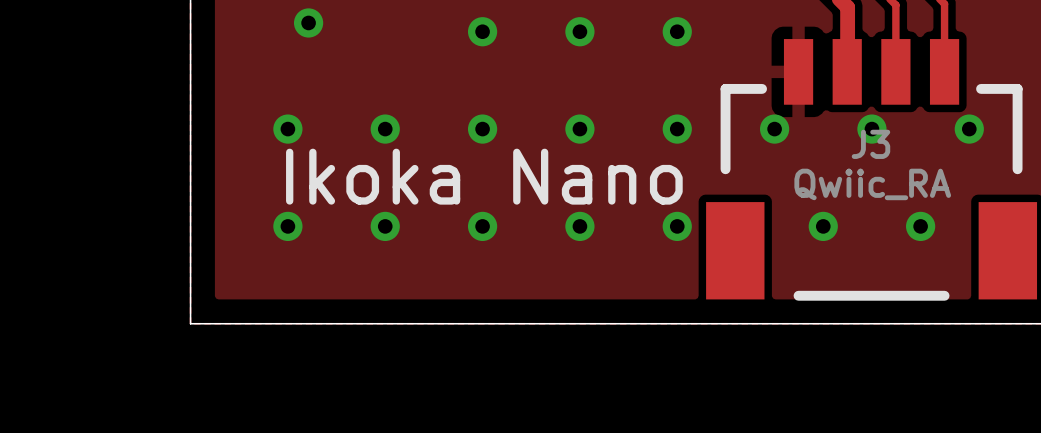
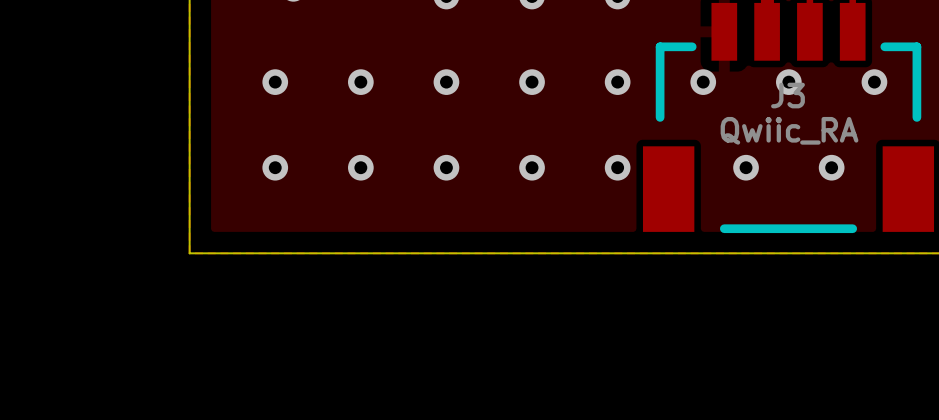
text: Ikoka Nano (484, 176) -> none

